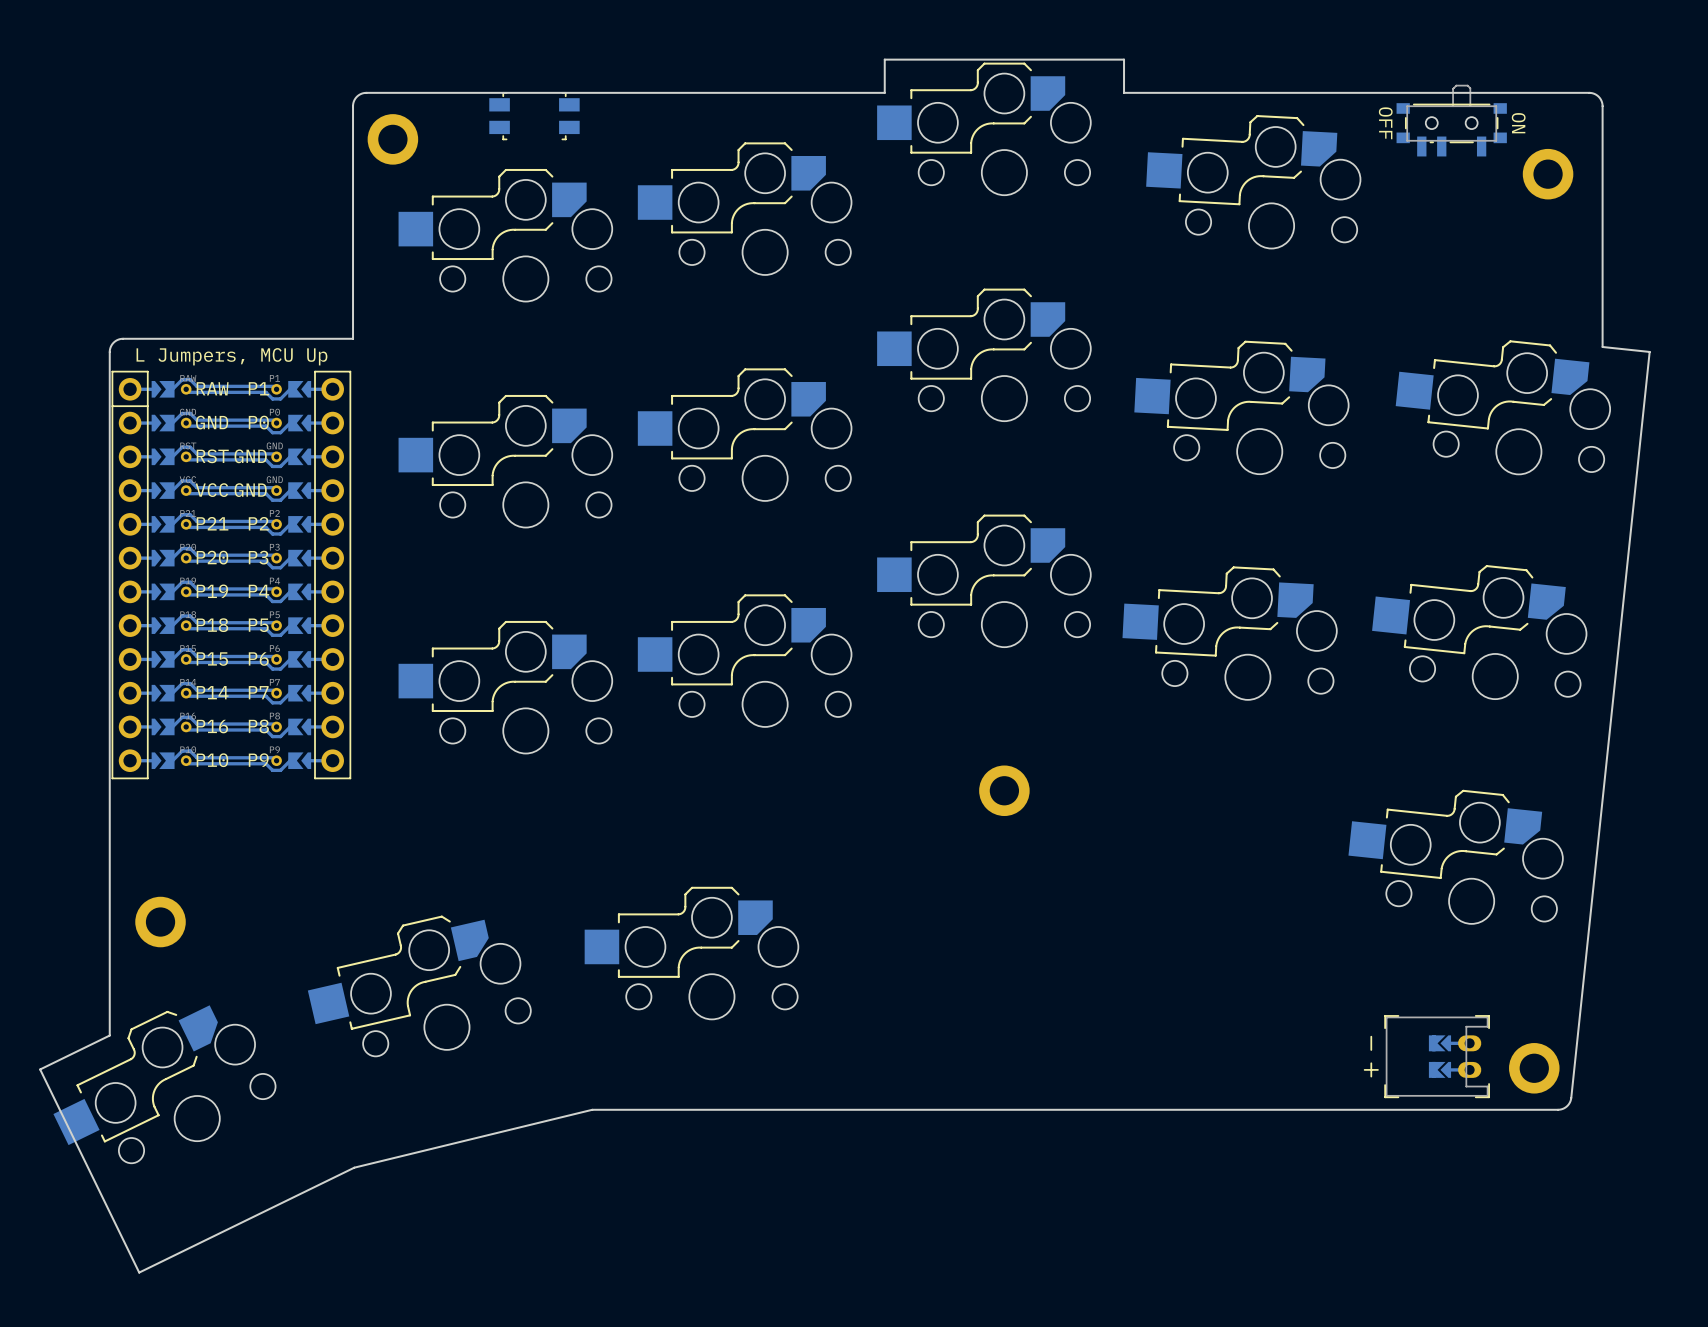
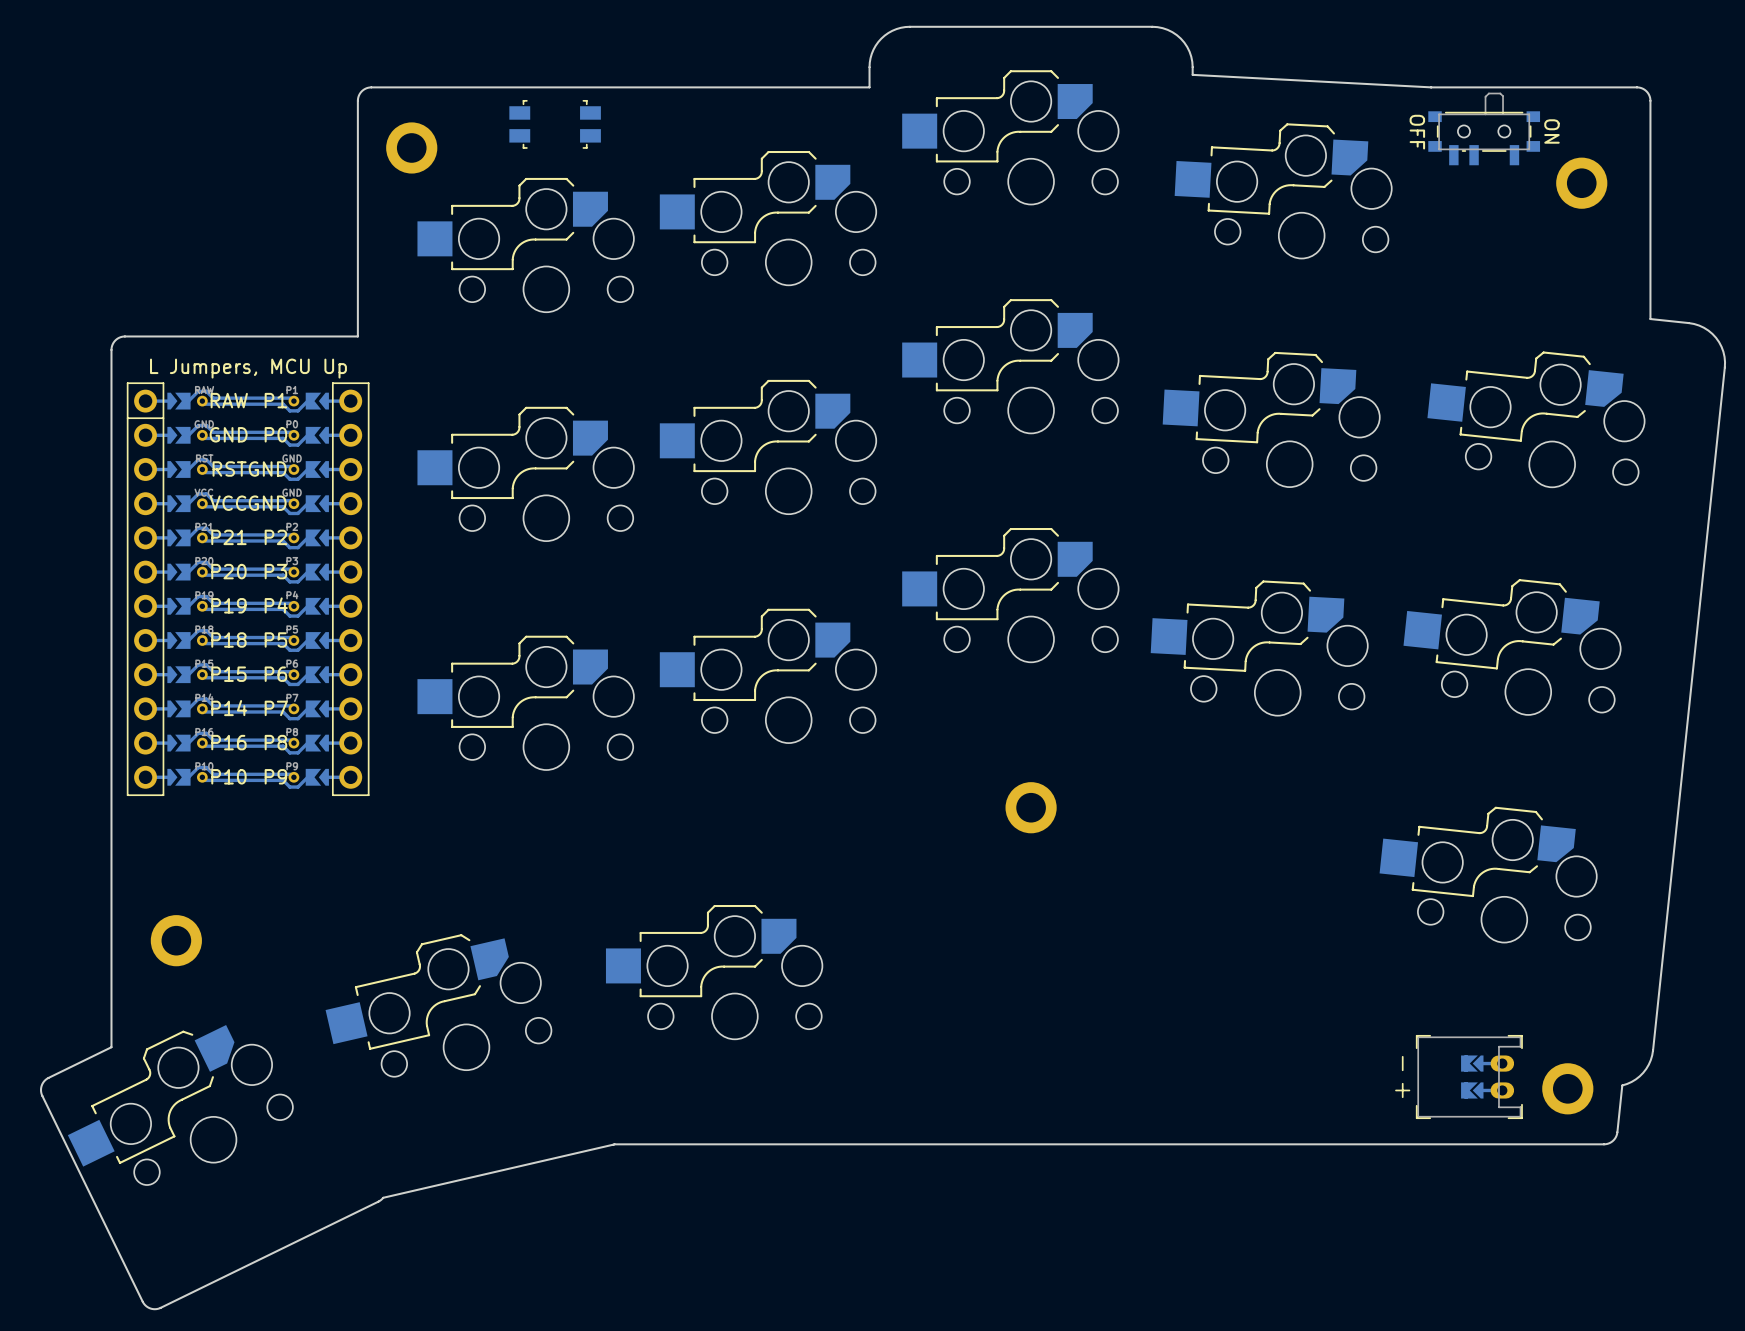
board edge: (1124, 59) (884, 59) (884, 92) (363, 93) (355, 97) (353, 106) (353, 338) (123, 338) (112, 343) (109, 352) (109, 1035) (40, 1069) (139, 1272) (354, 1167) (592, 1109) (1558, 1109) (1568, 1105) (1571, 1097) (1649, 351) (1602, 346) (1601, 100) (1596, 94) (1589, 92) (1124, 92) (1124, 59) -> (1152, 26) (1167, 29) (1184, 42) (1191, 56) (1192, 74) (1431, 87) (1636, 87) (1644, 89) (1649, 95) (1650, 319) (1688, 323) (1703, 327) (1719, 342) (1725, 362) (1653, 1050) (1648, 1064) (1643, 1072) (1635, 1079) (1622, 1085) (1617, 1132) (1614, 1139) (1603, 1144) (614, 1144) (383, 1197) (160, 1307) (153, 1309) (146, 1306) (40, 1090) (43, 1082) (47, 1078) (111, 1047) (111, 349) (114, 341) (124, 336) (357, 336) (357, 100) (360, 92) (366, 88) (869, 87) (869, 62) (873, 49) (884, 35) (900, 27) (1152, 26)

